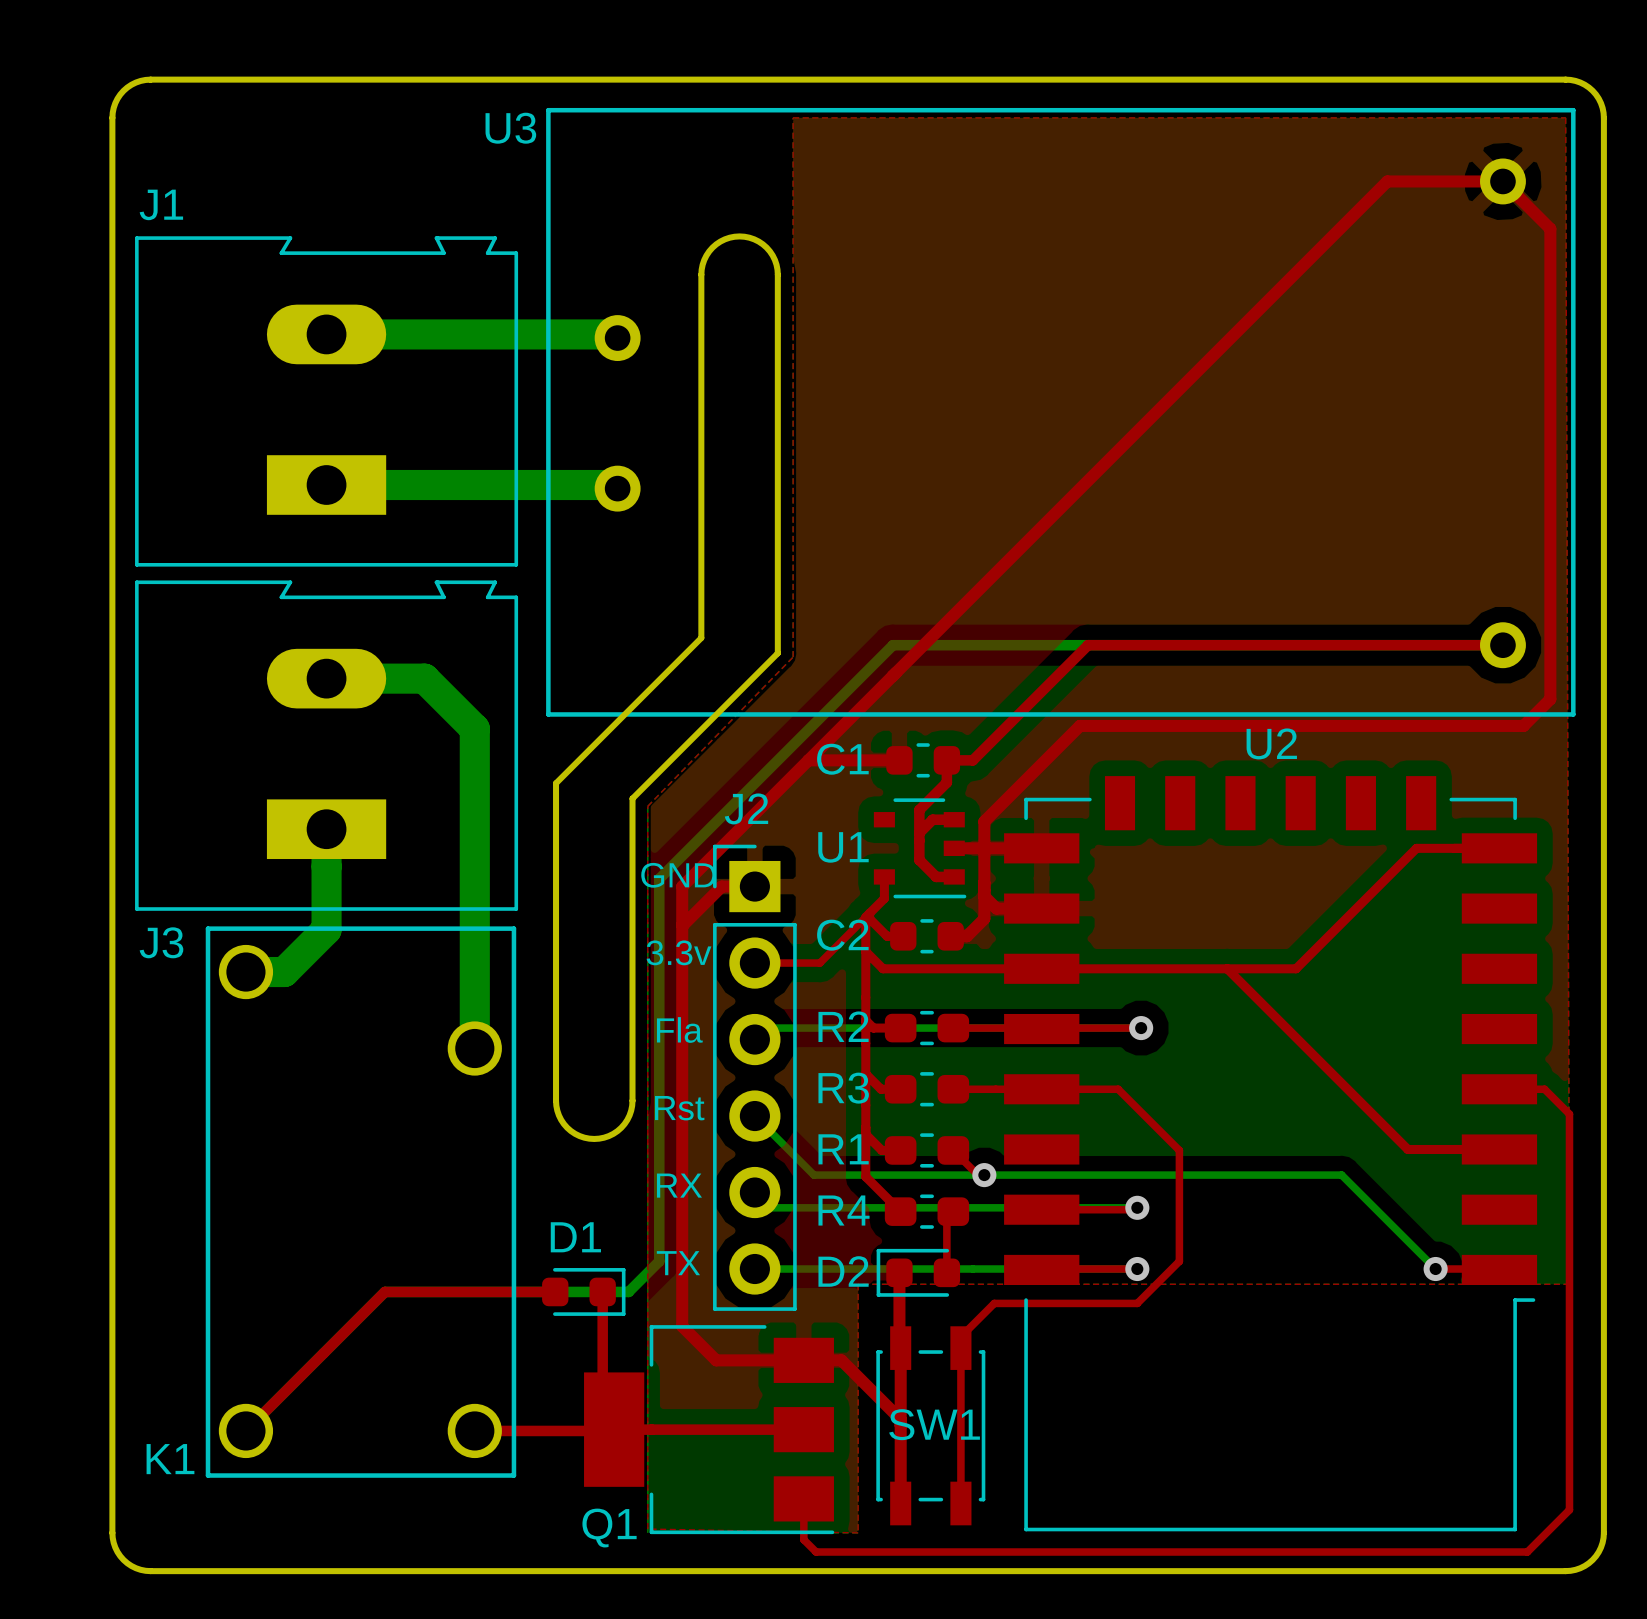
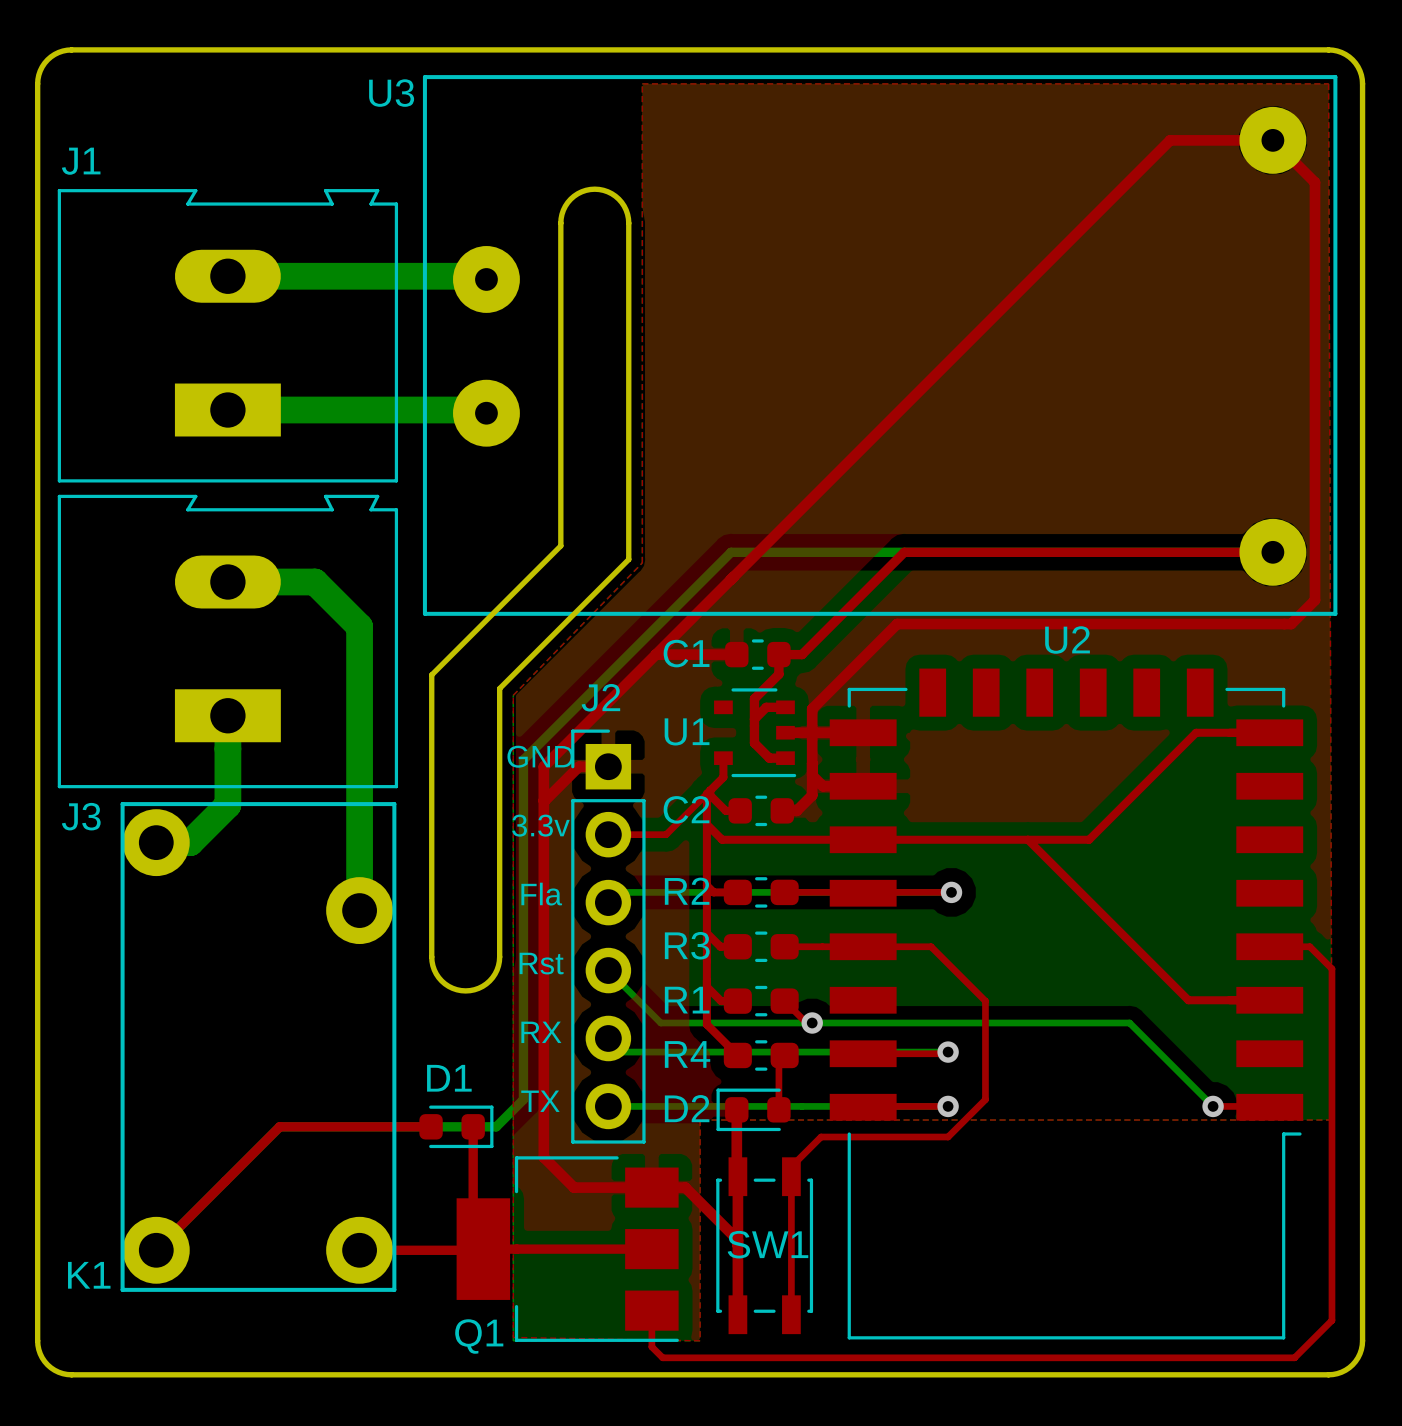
U3 footprint: [546, 107, 1576, 717] -> [422, 75, 1338, 616]
K1 footprint: [205, 926, 517, 1478] -> [120, 802, 397, 1292]

